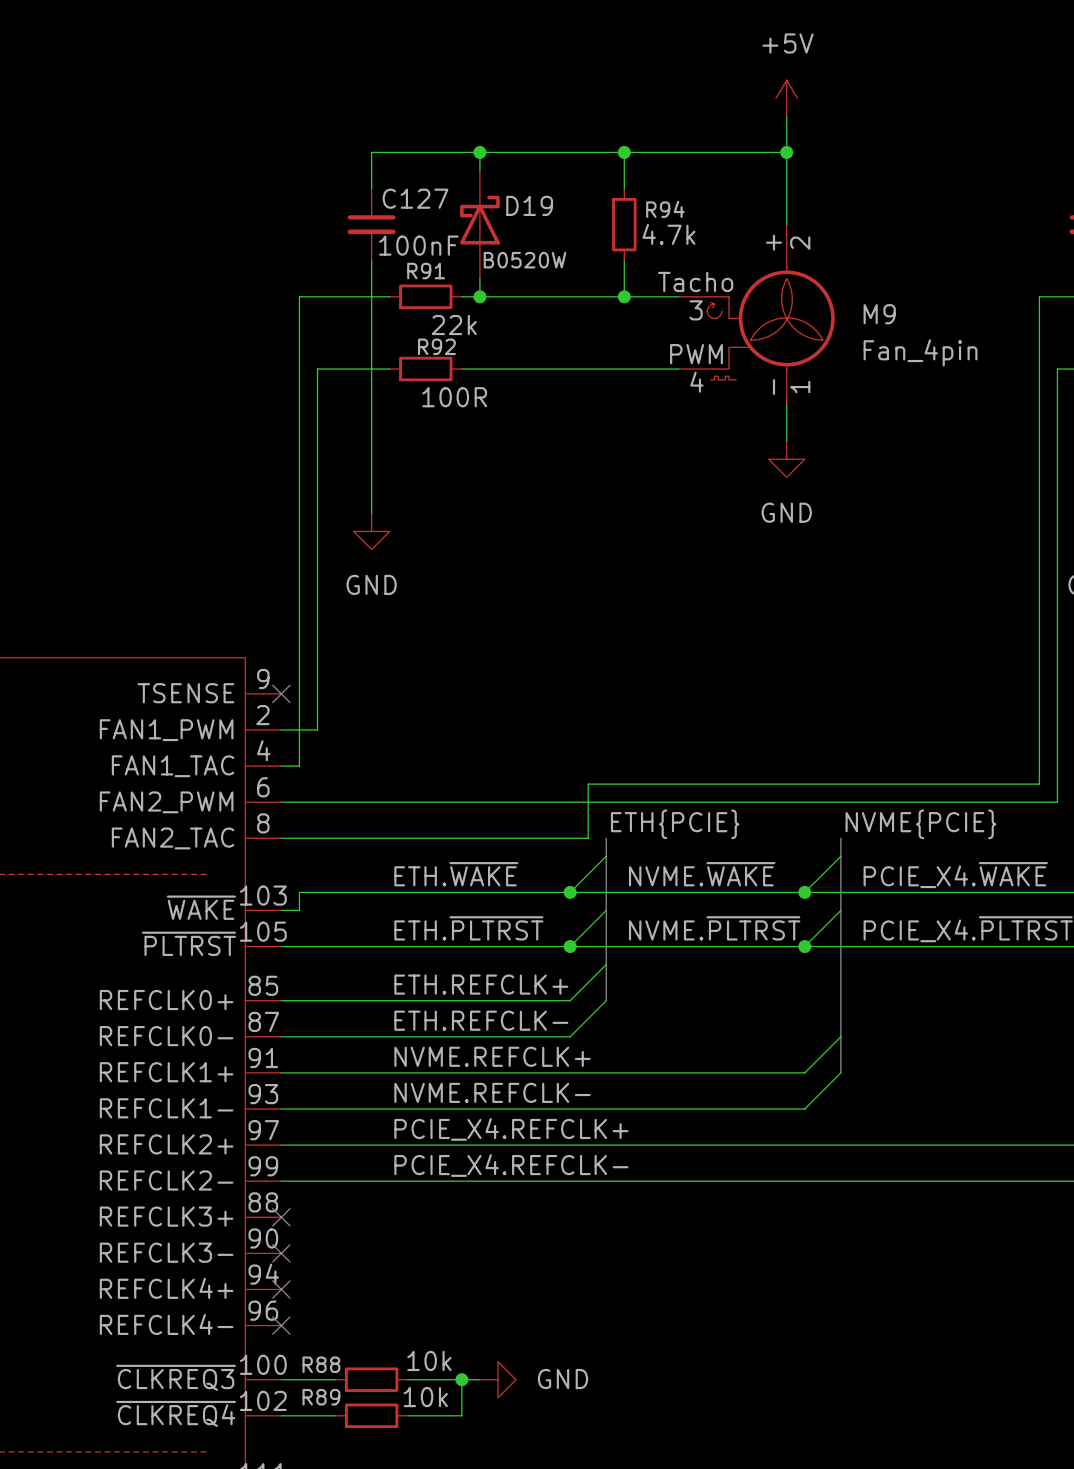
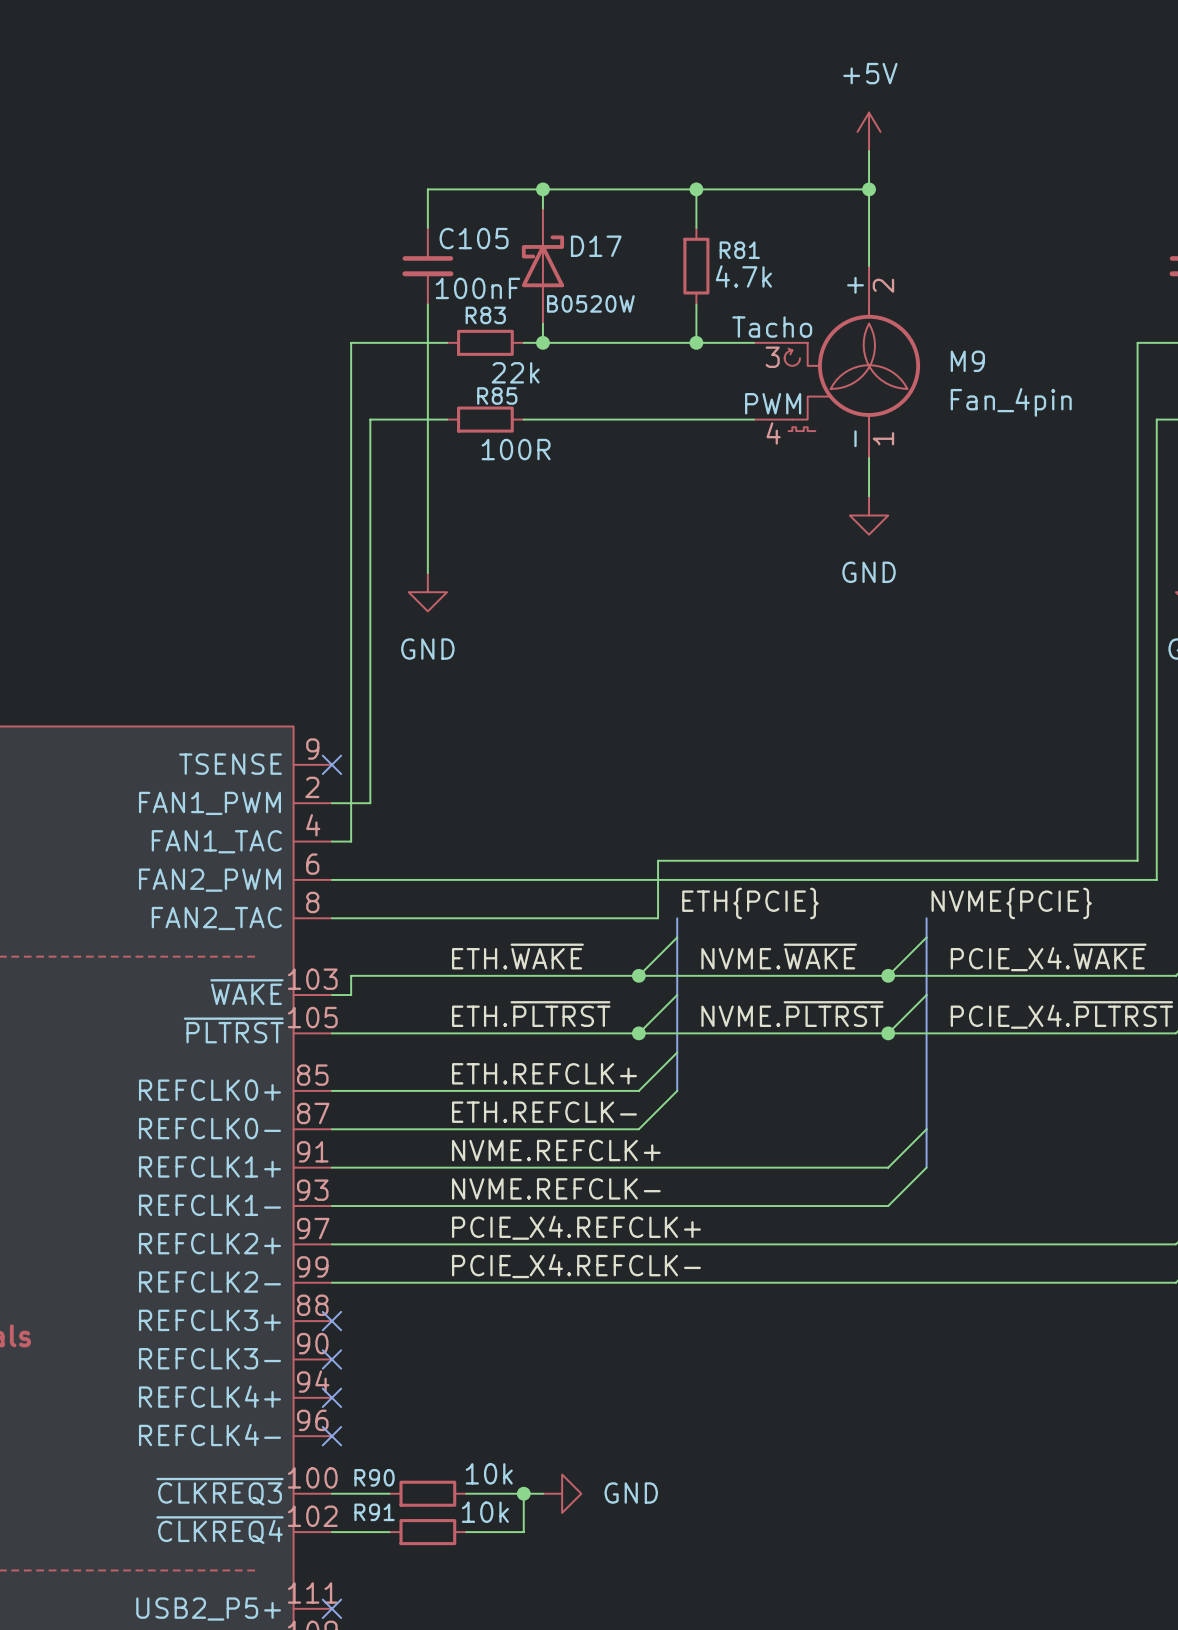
C127 name: C127 (415, 198) -> C105 (474, 238)
D19 name: D19 (529, 205) -> D17 (596, 246)
R94 name: R94 (665, 209) -> R81 (739, 250)
R91 name: R91 (426, 271) -> R83 (485, 315)
R92 name: R92 (436, 346) -> R85 (497, 395)
R88 name: R88 (321, 1364) -> R90 (374, 1477)
R89 name: R89 (321, 1397) -> R91 (374, 1512)

